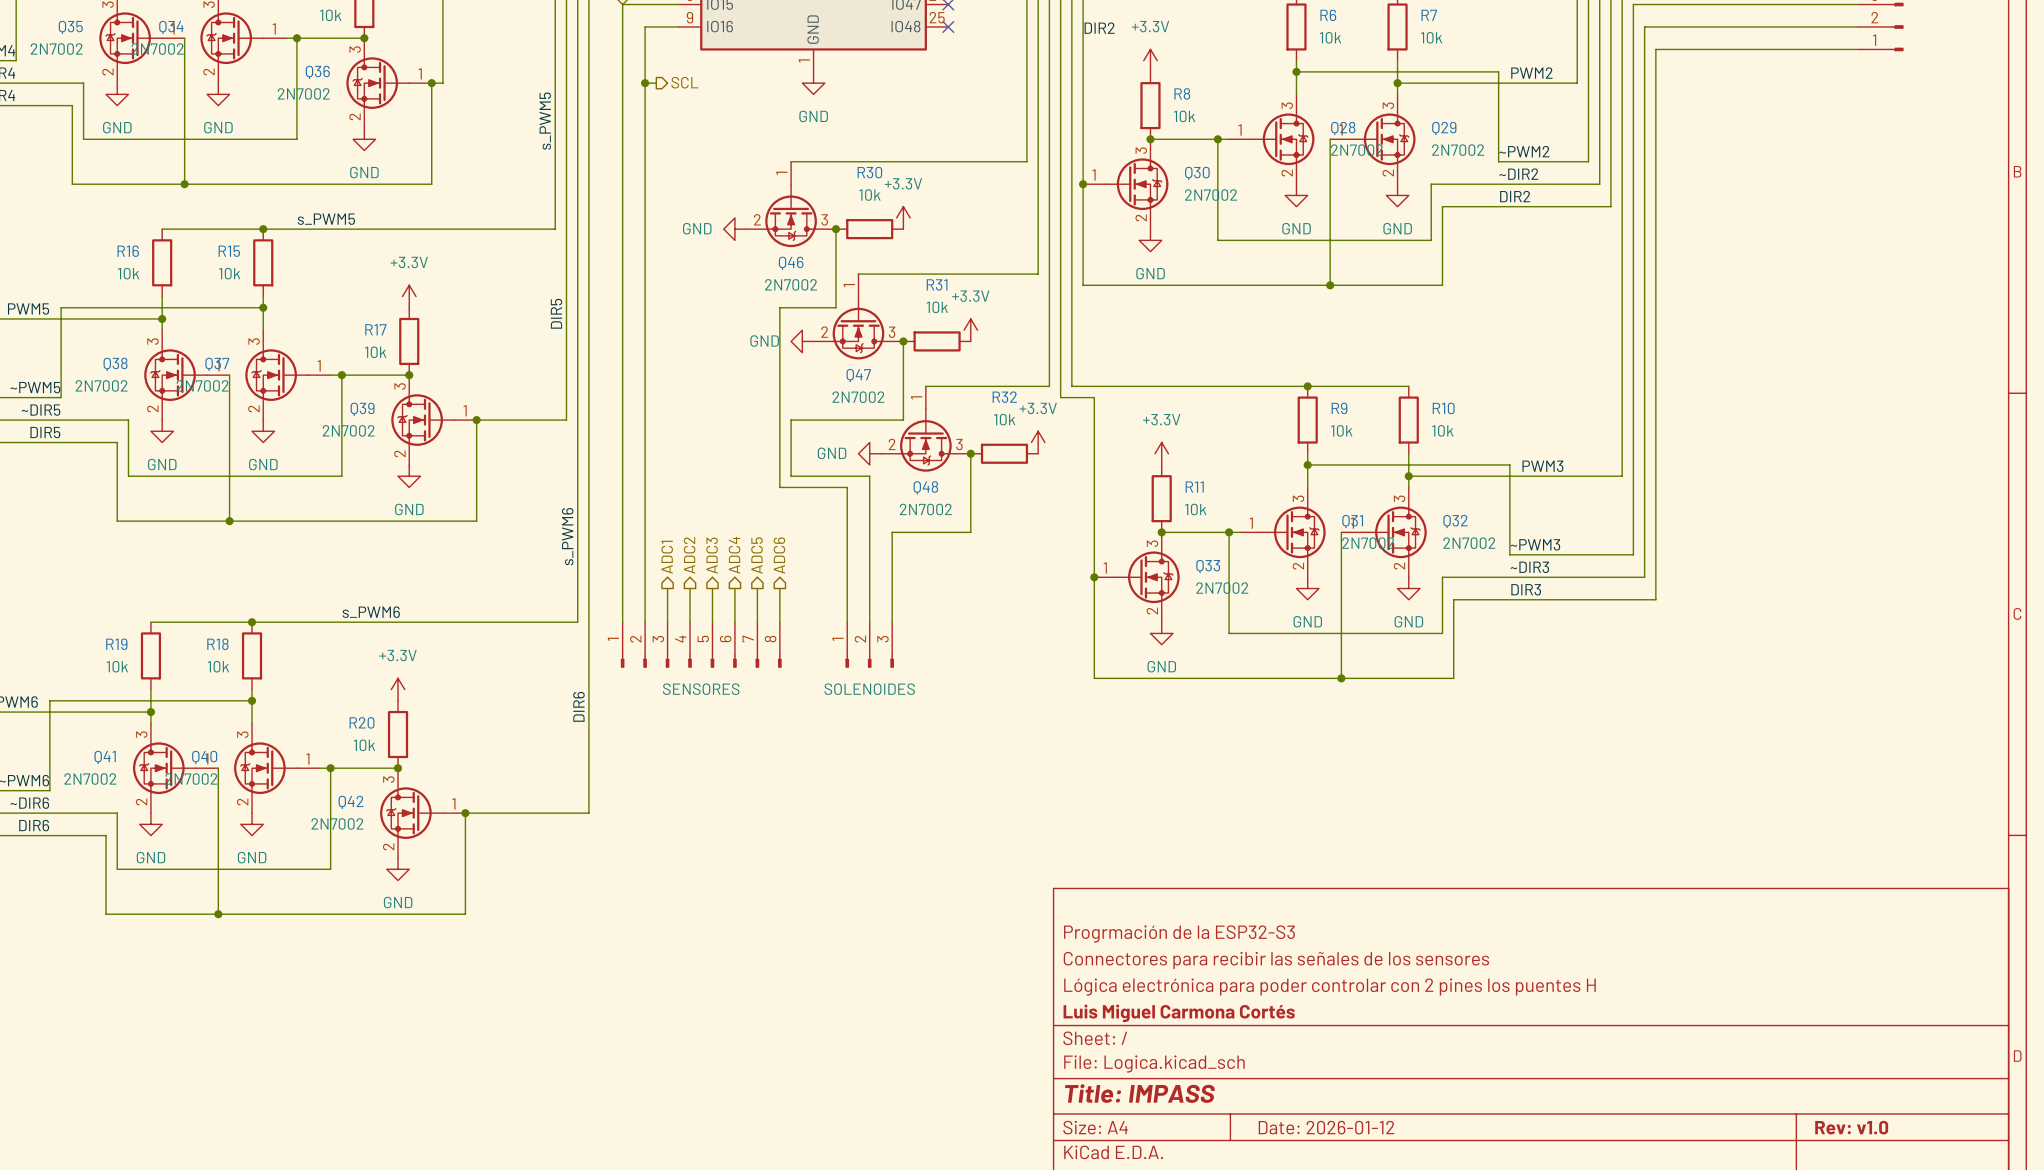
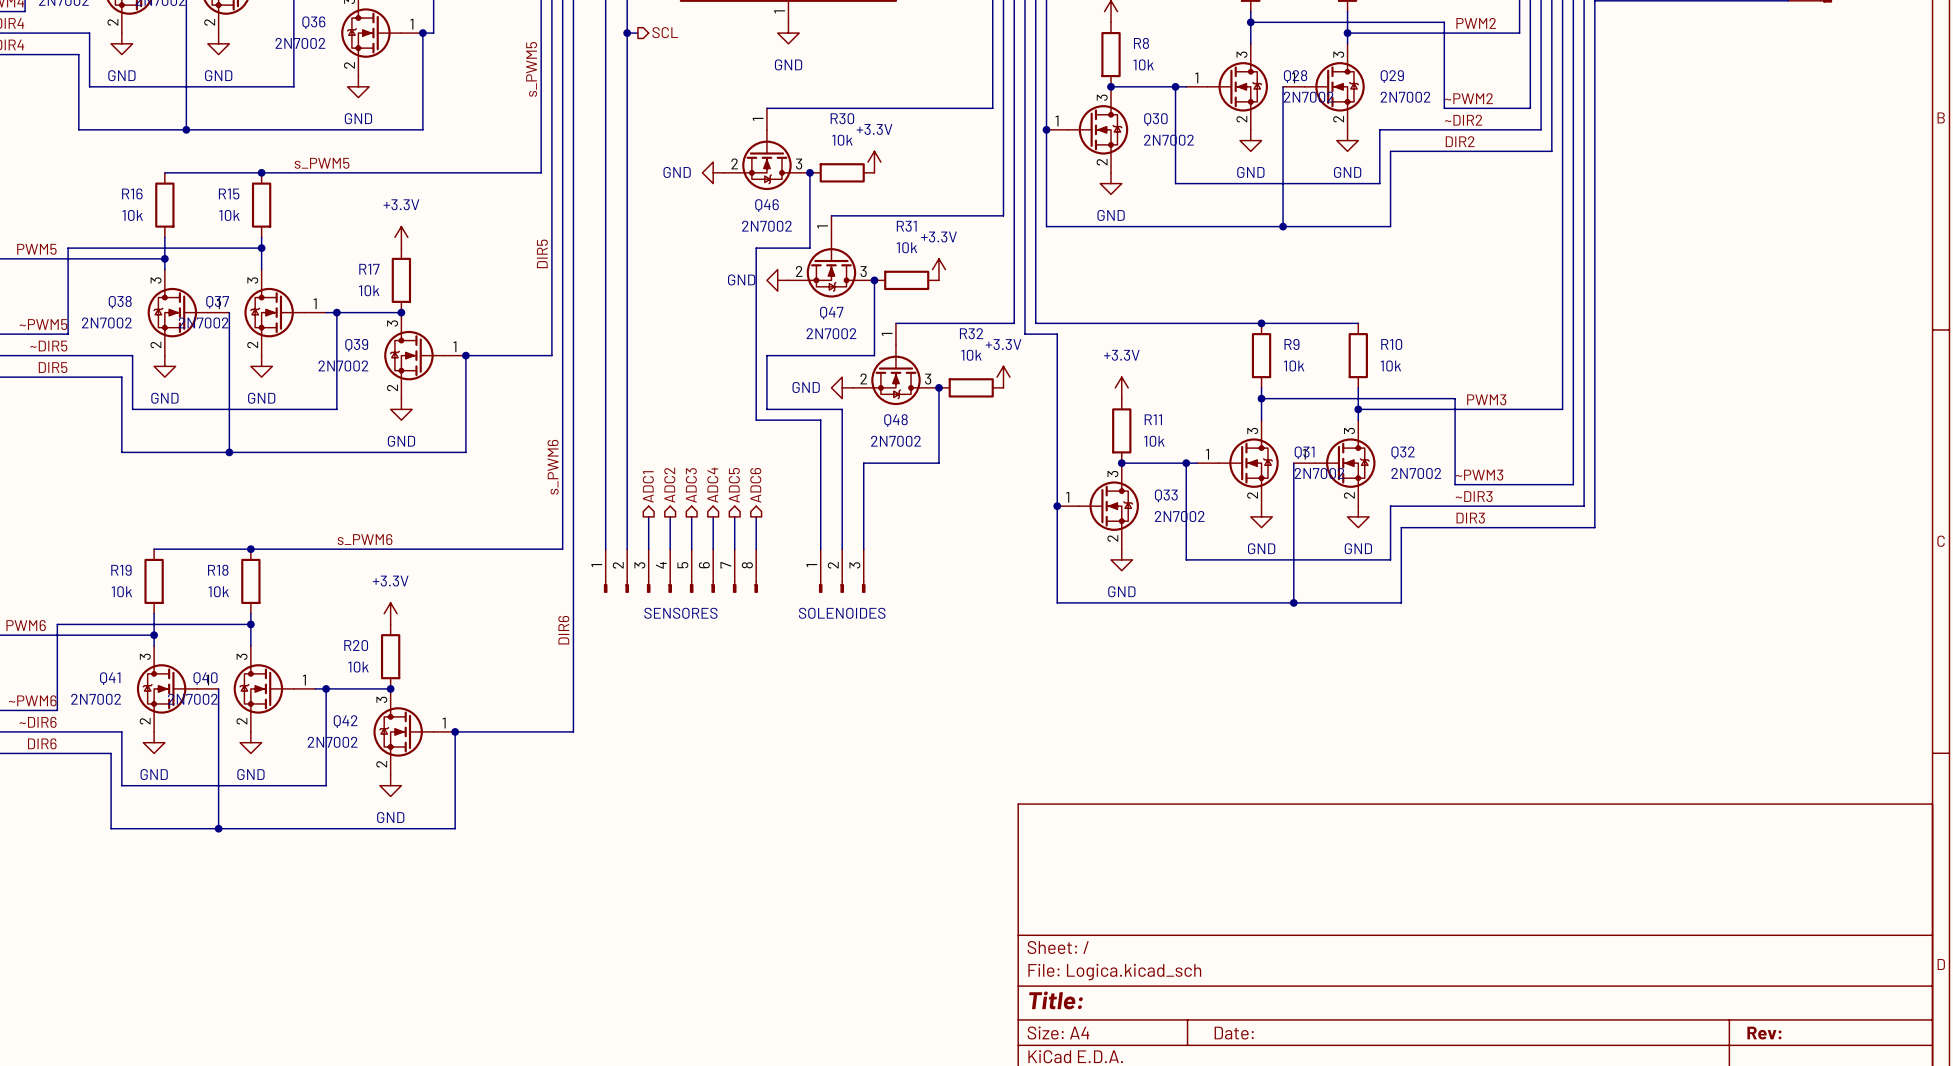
title block: Progrmación de la ESP32-S3 (1179, 933) -> none
title block: Connectores para recibir las señales de los sensores (1276, 960) -> none
title block: Lógica electrónica para poder controlar con 2 pines los puentes H (1329, 987) -> none
title block: Luis Miguel Carmona Cortés (1179, 1013) -> none
title block: Title: IMPASS (1139, 1093) -> Title: (1056, 1000)
title block: Date: 2026-01-12 (1326, 1127) -> Date: (1234, 1033)
title block: Rev: v1.0 (1851, 1127) -> Rev: (1764, 1033)

